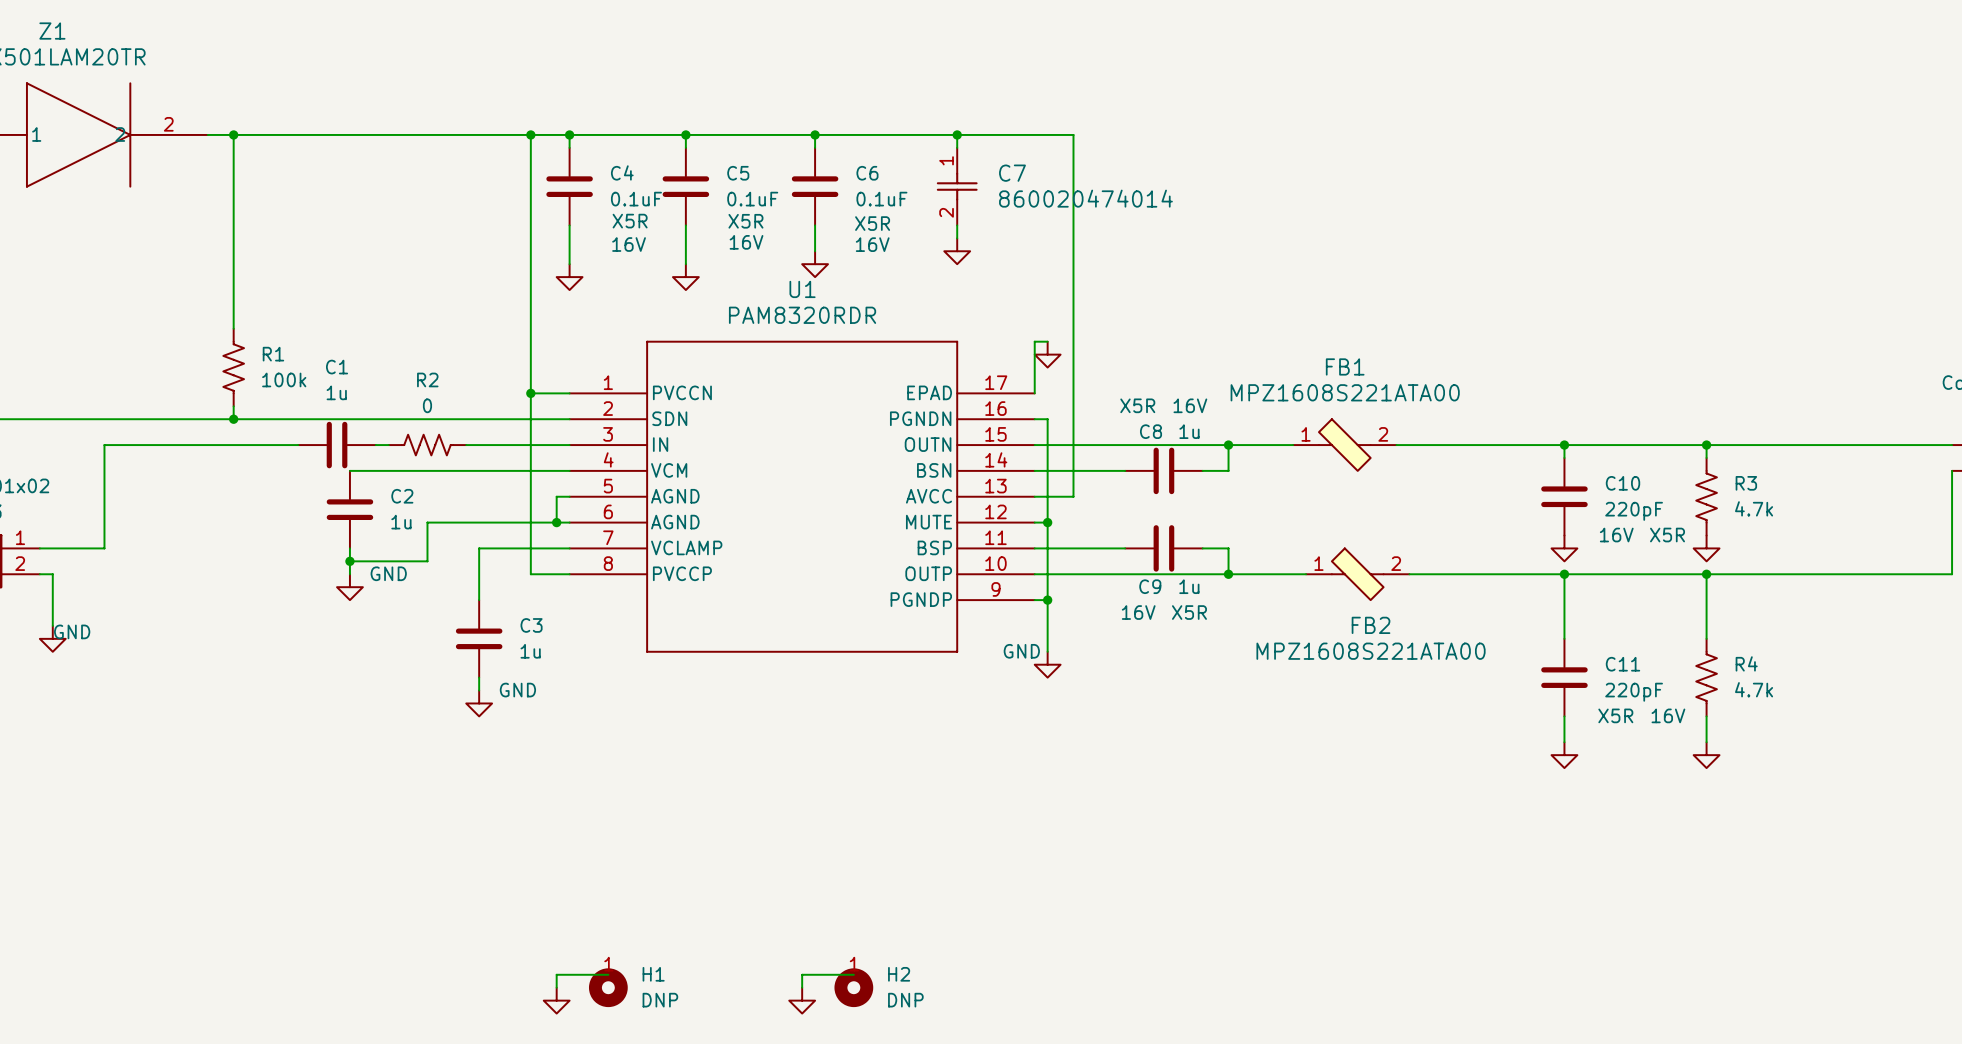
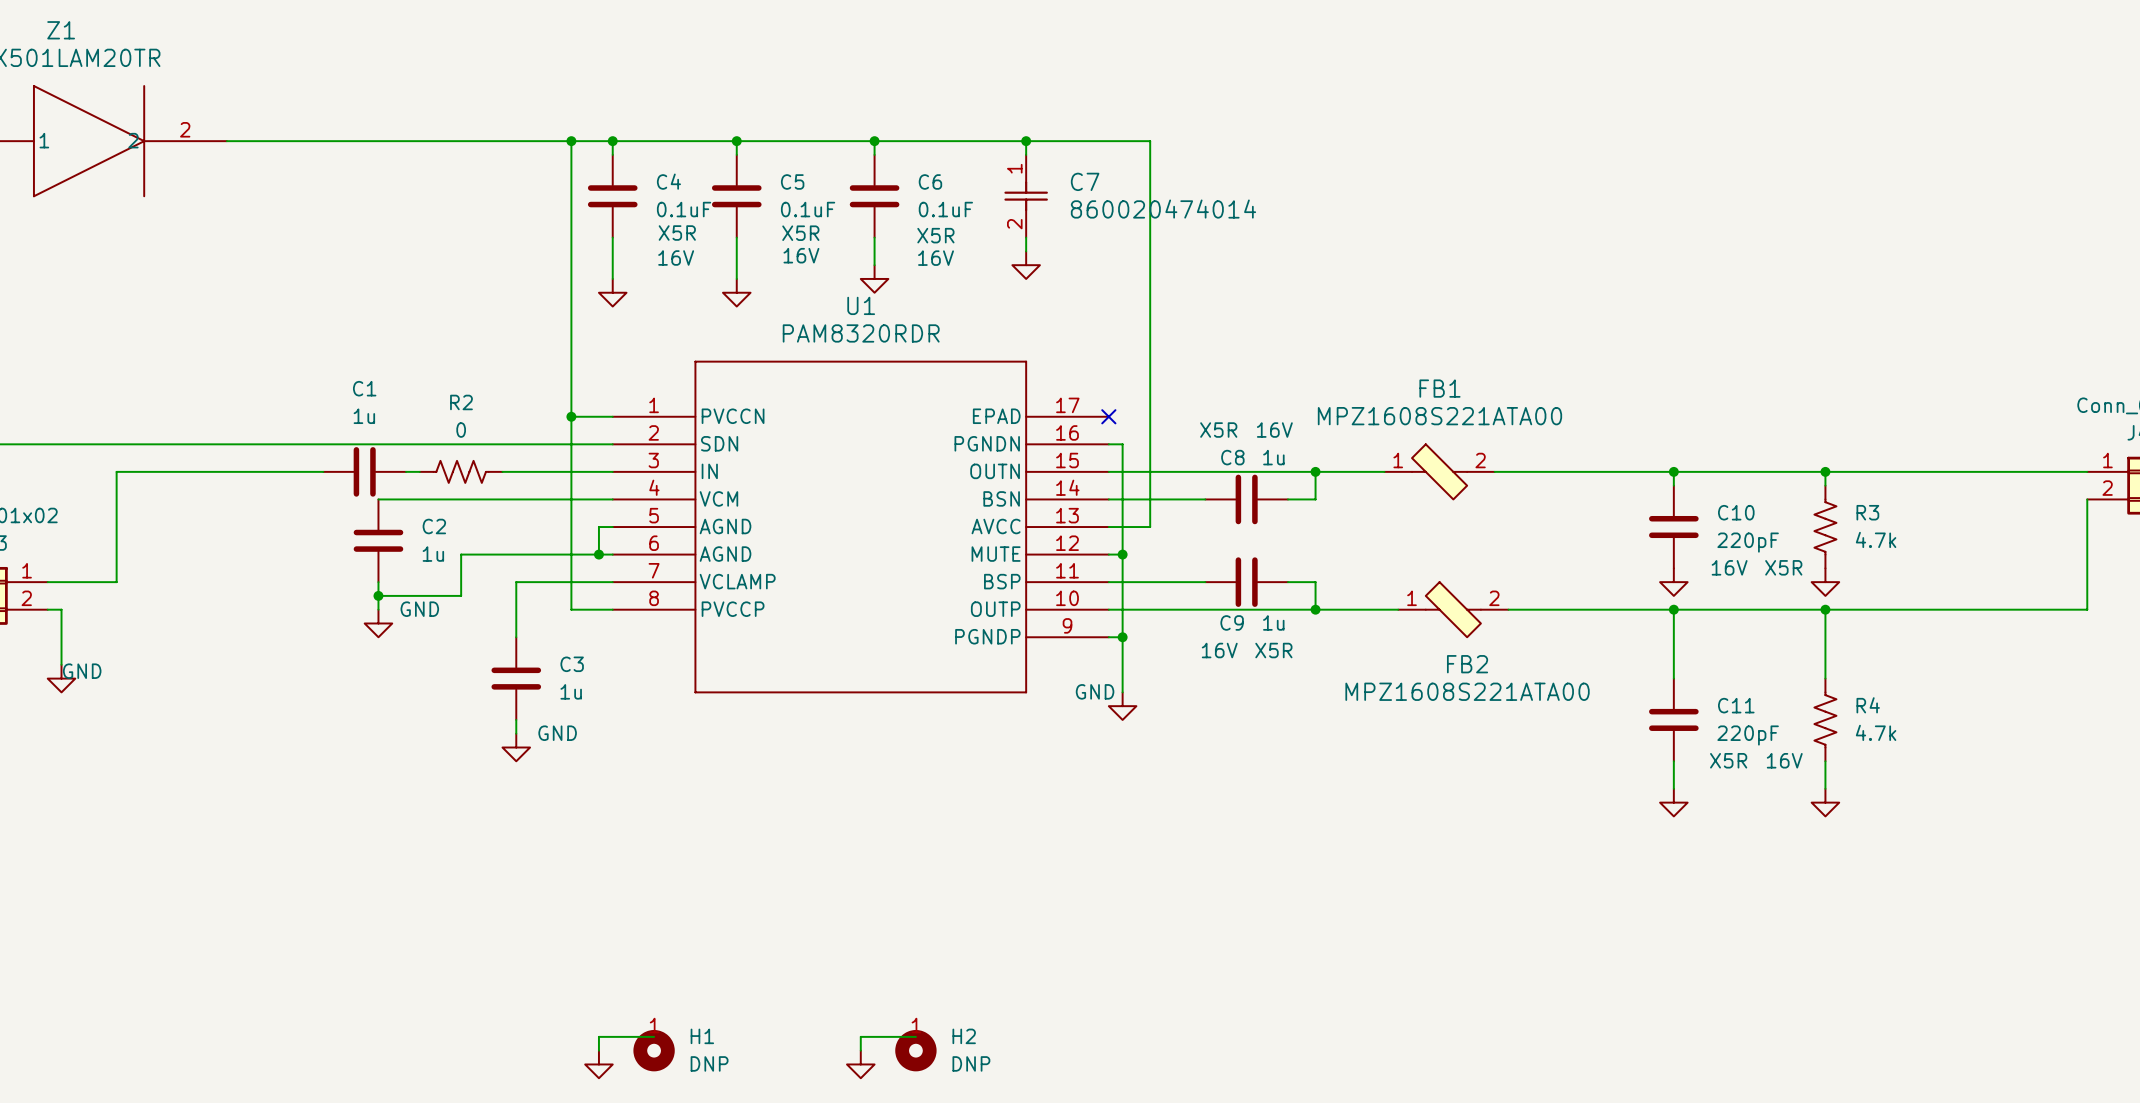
wire: (233, 134) (233, 328) -> none
junction: (233, 134) -> none
wire: (1047, 341) (1034, 341) (1034, 393) -> none
power symbol: (1047, 354) -> none
R1: 100k (233, 367) -> none
no-connect mark: none -> (1108, 416)
wire: (233, 406) (233, 419) -> none
junction: (233, 419) -> none

